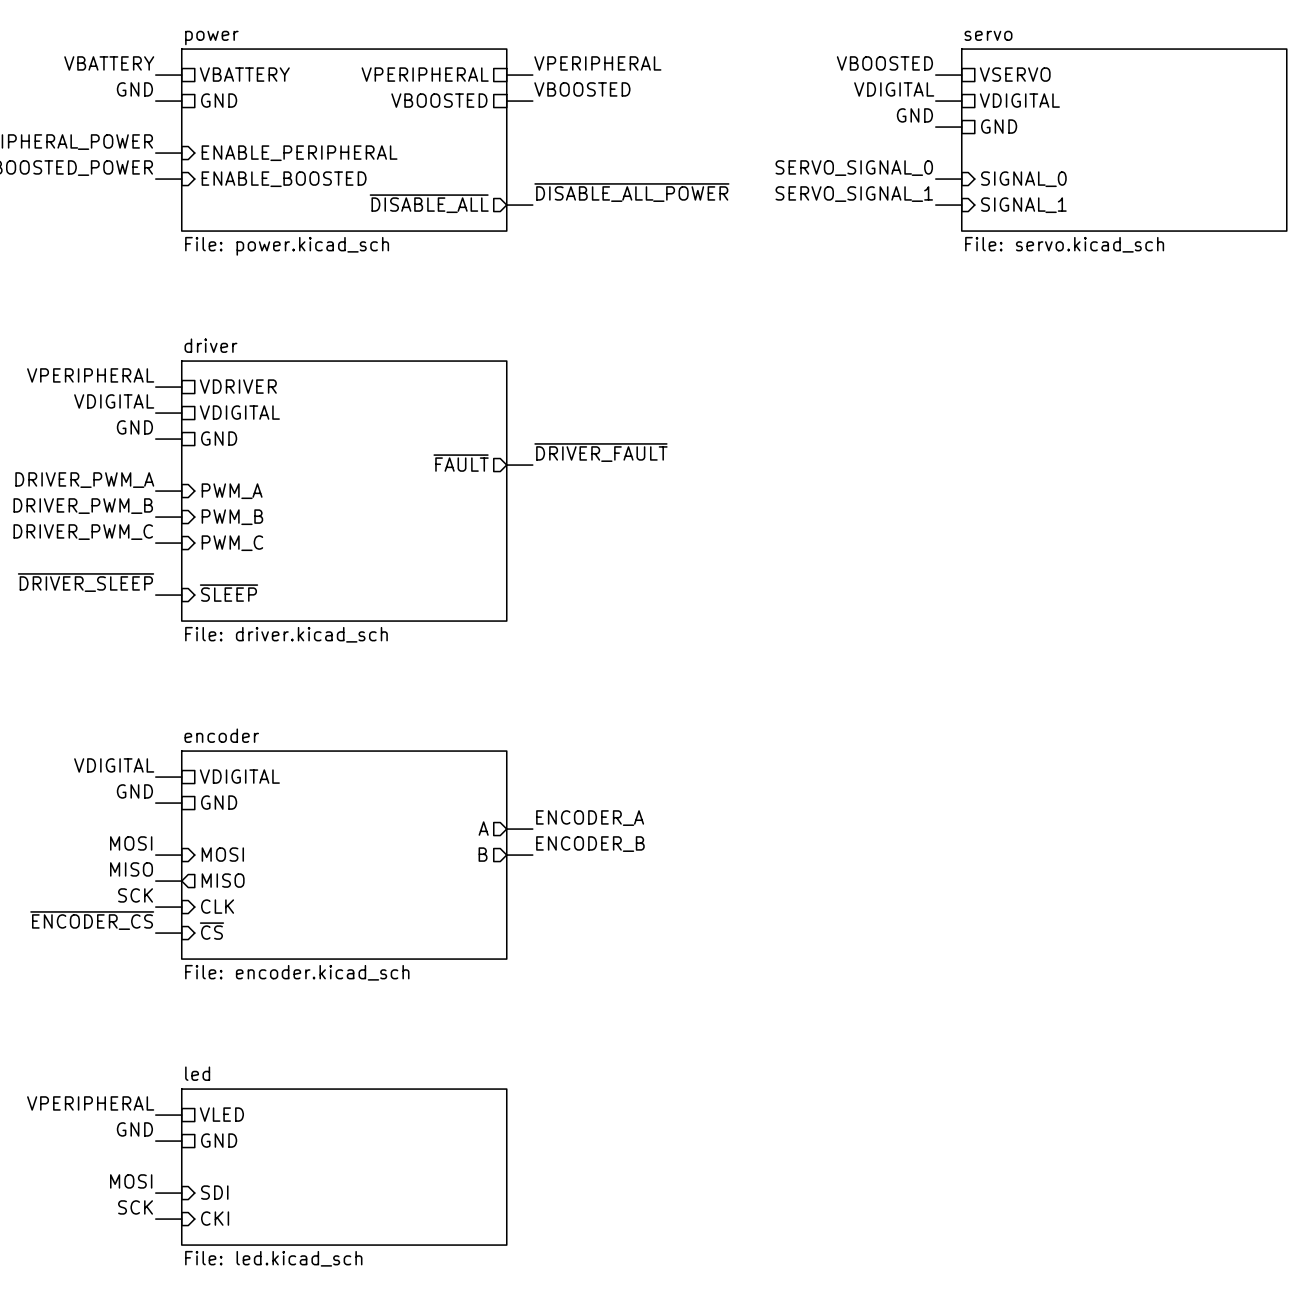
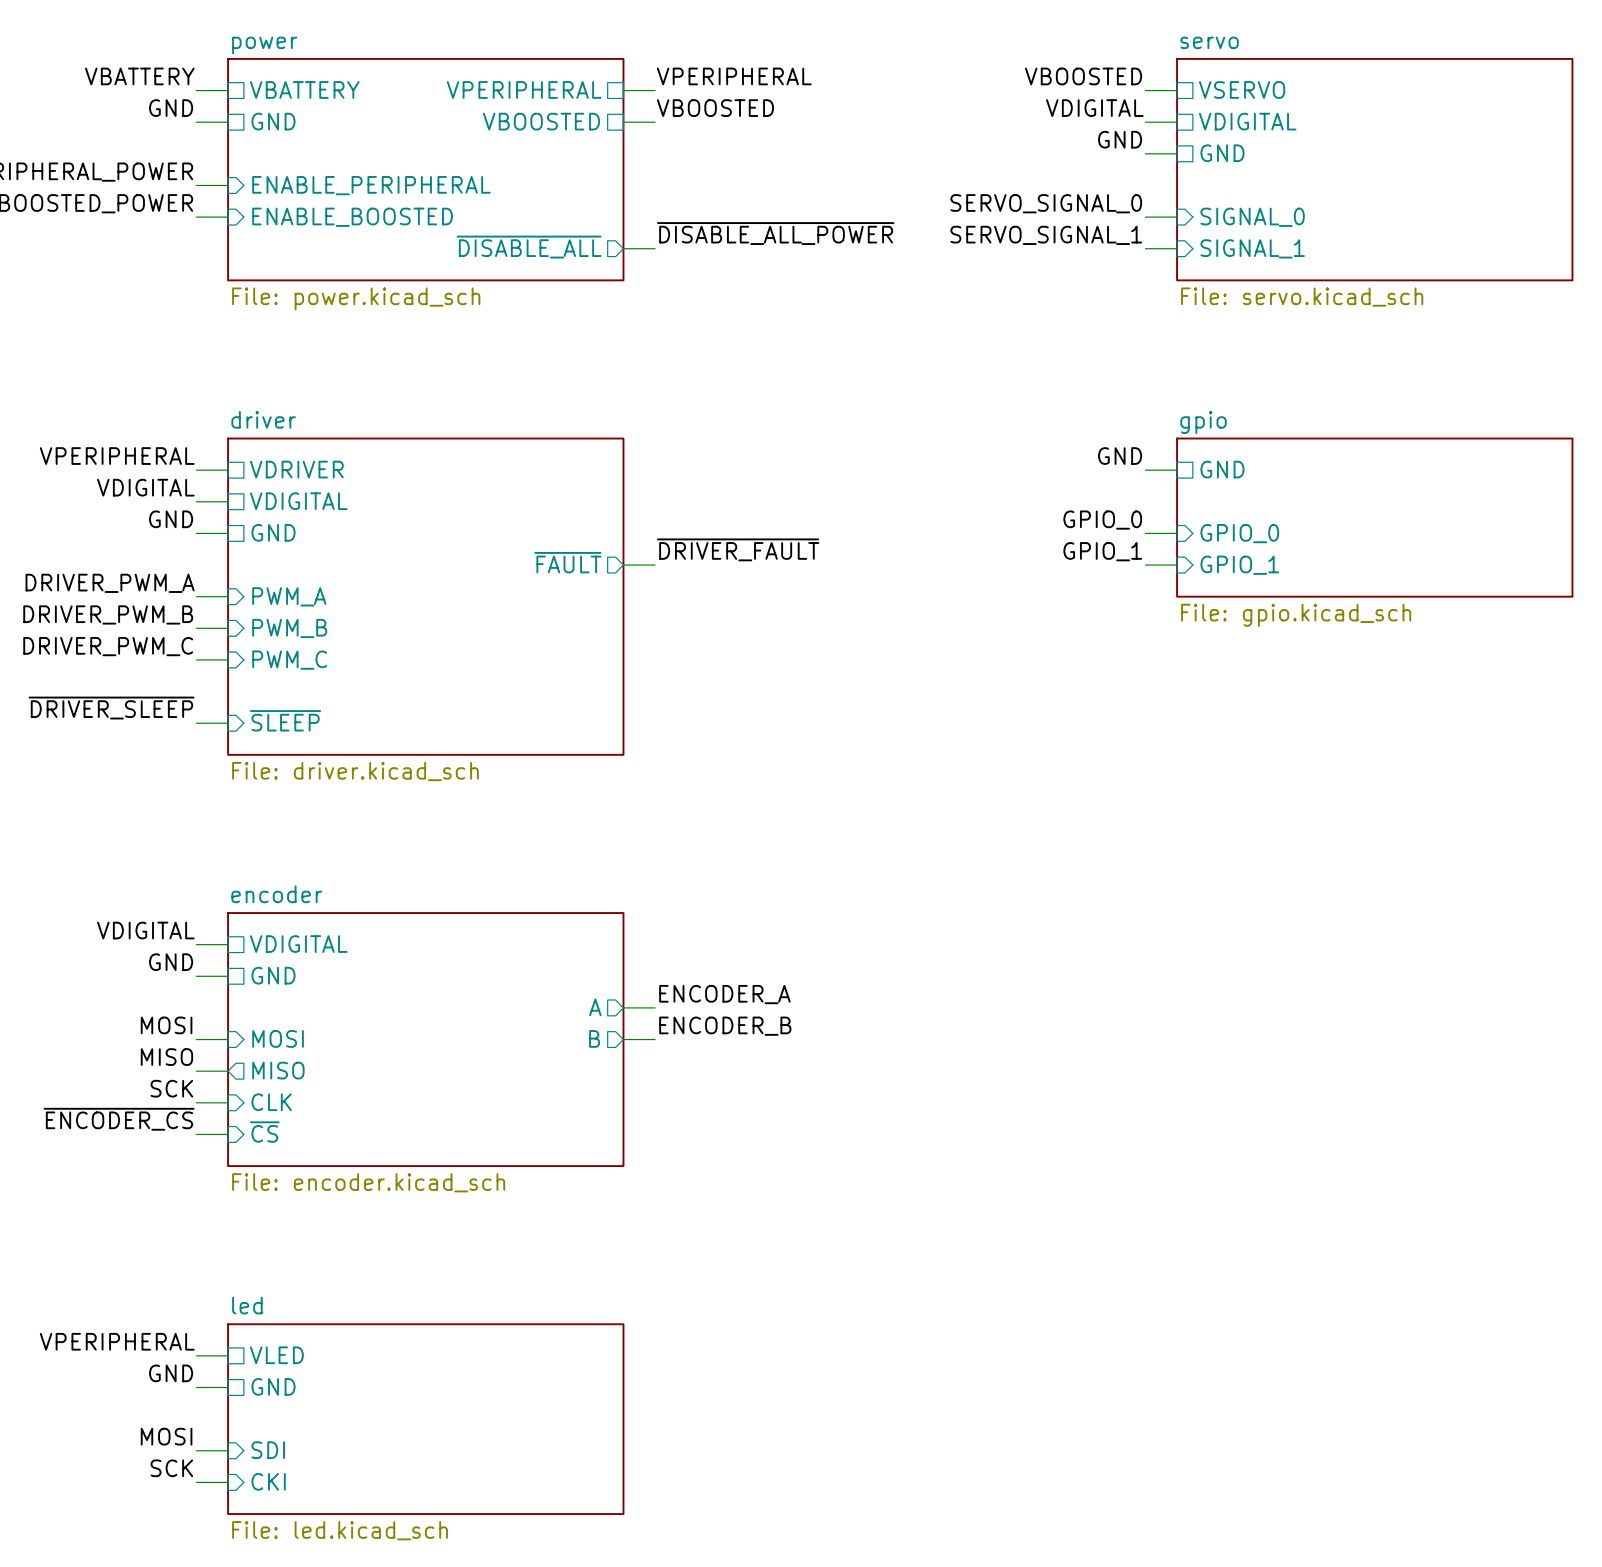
label: none -> GND (1120, 456)
sheet pin: none -> GND (1222, 469)
wire: none -> (1145, 470) (1177, 470)
sheet gpio: none -> File: gpio.kicad_sch (1374, 517)
label: none -> GPIO_0 (1102, 520)
wire: none -> (1145, 533) (1177, 533)
sheet pin: none -> GPIO_0 (1239, 533)
label: none -> GPIO_1 (1102, 551)
wire: none -> (1145, 565) (1177, 565)
sheet pin: none -> GPIO_1 (1239, 565)

